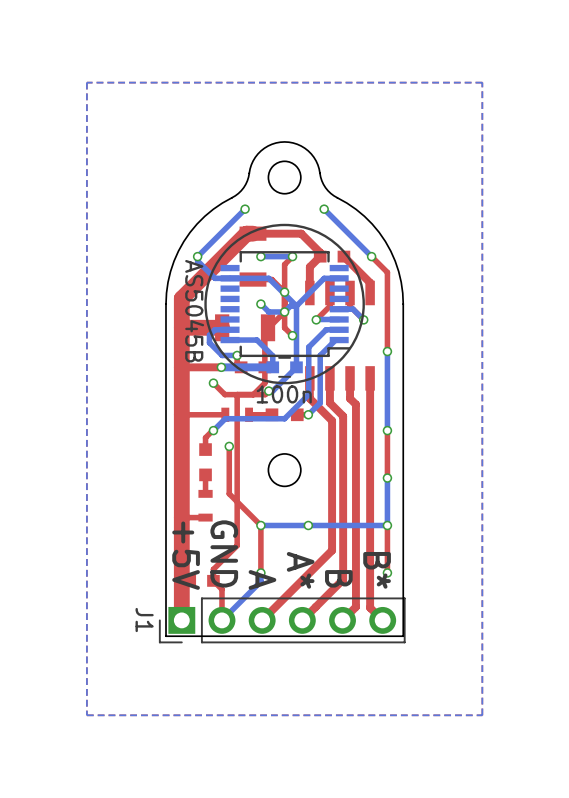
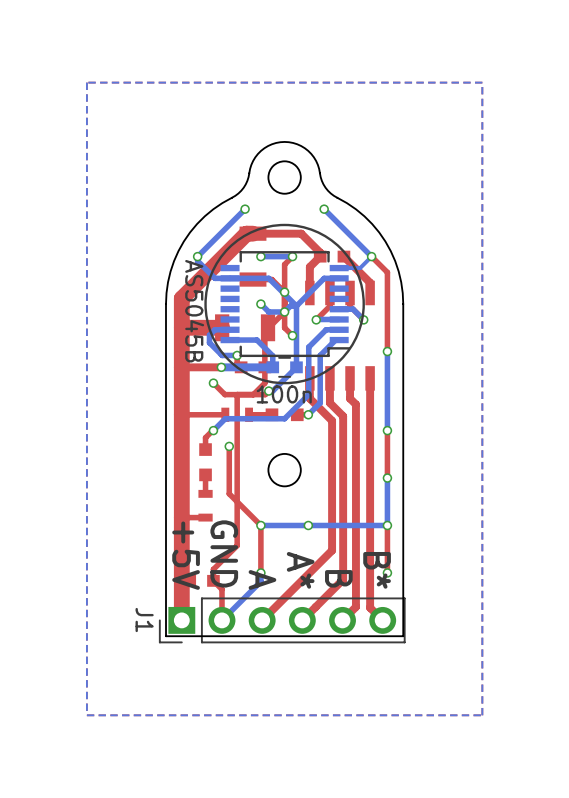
bottom track: none -> (371, 256) (360, 268) (339, 268)

